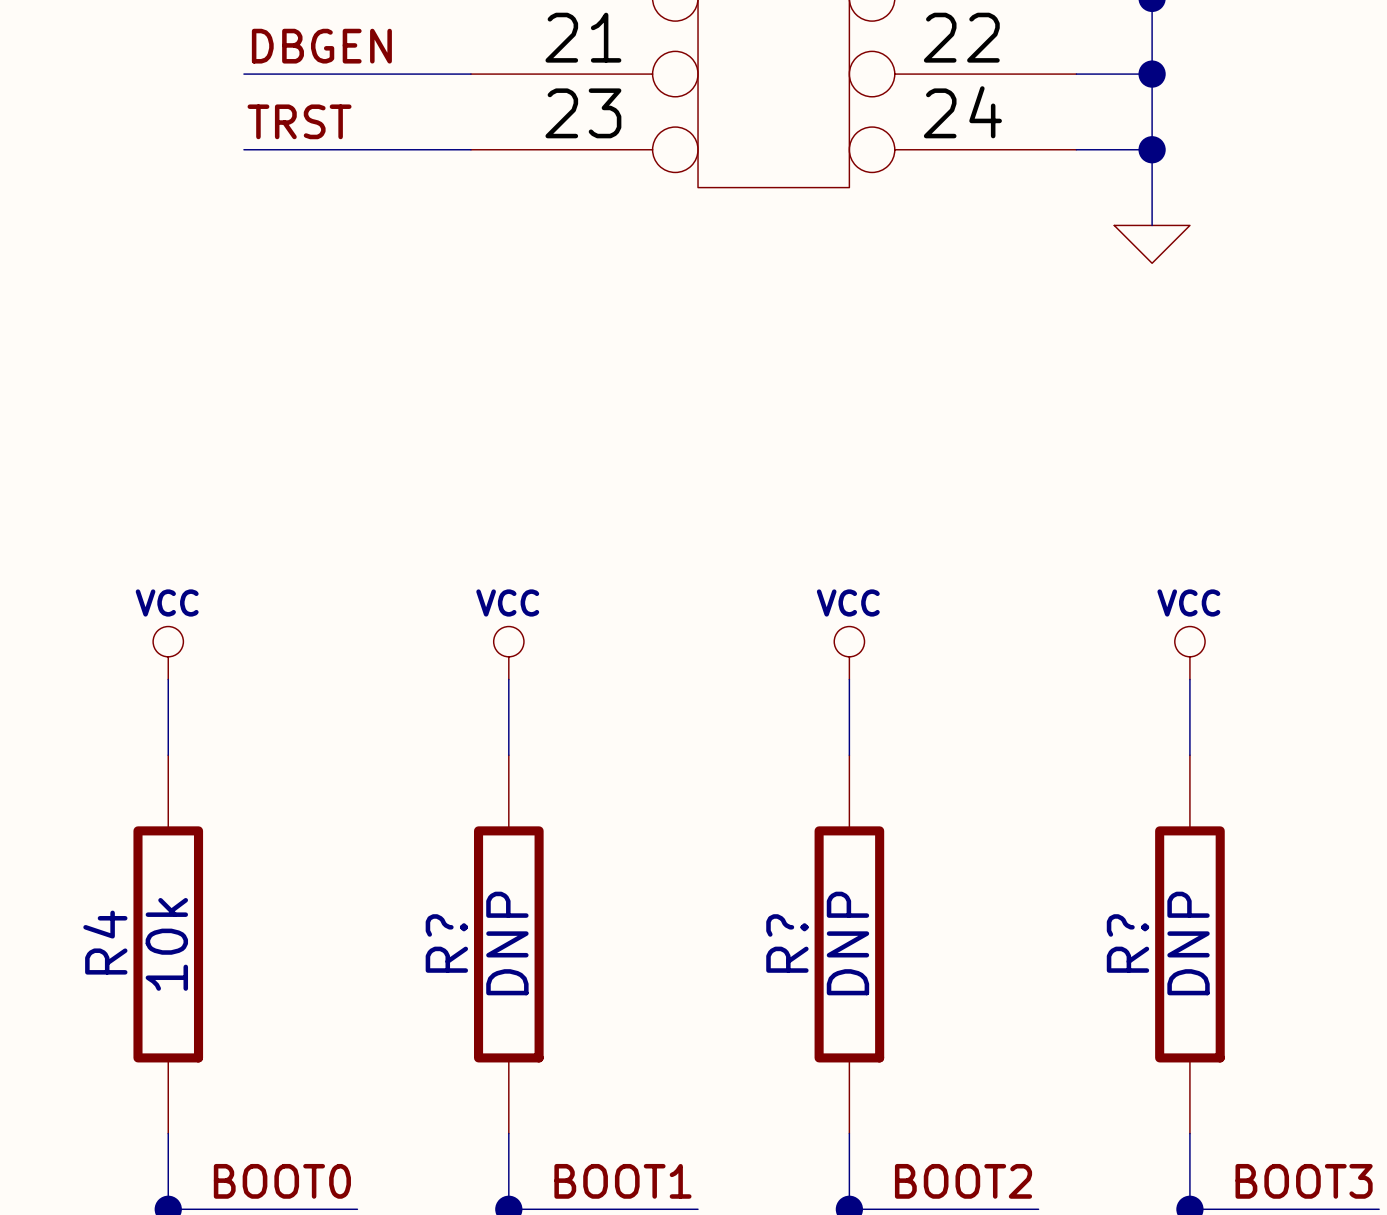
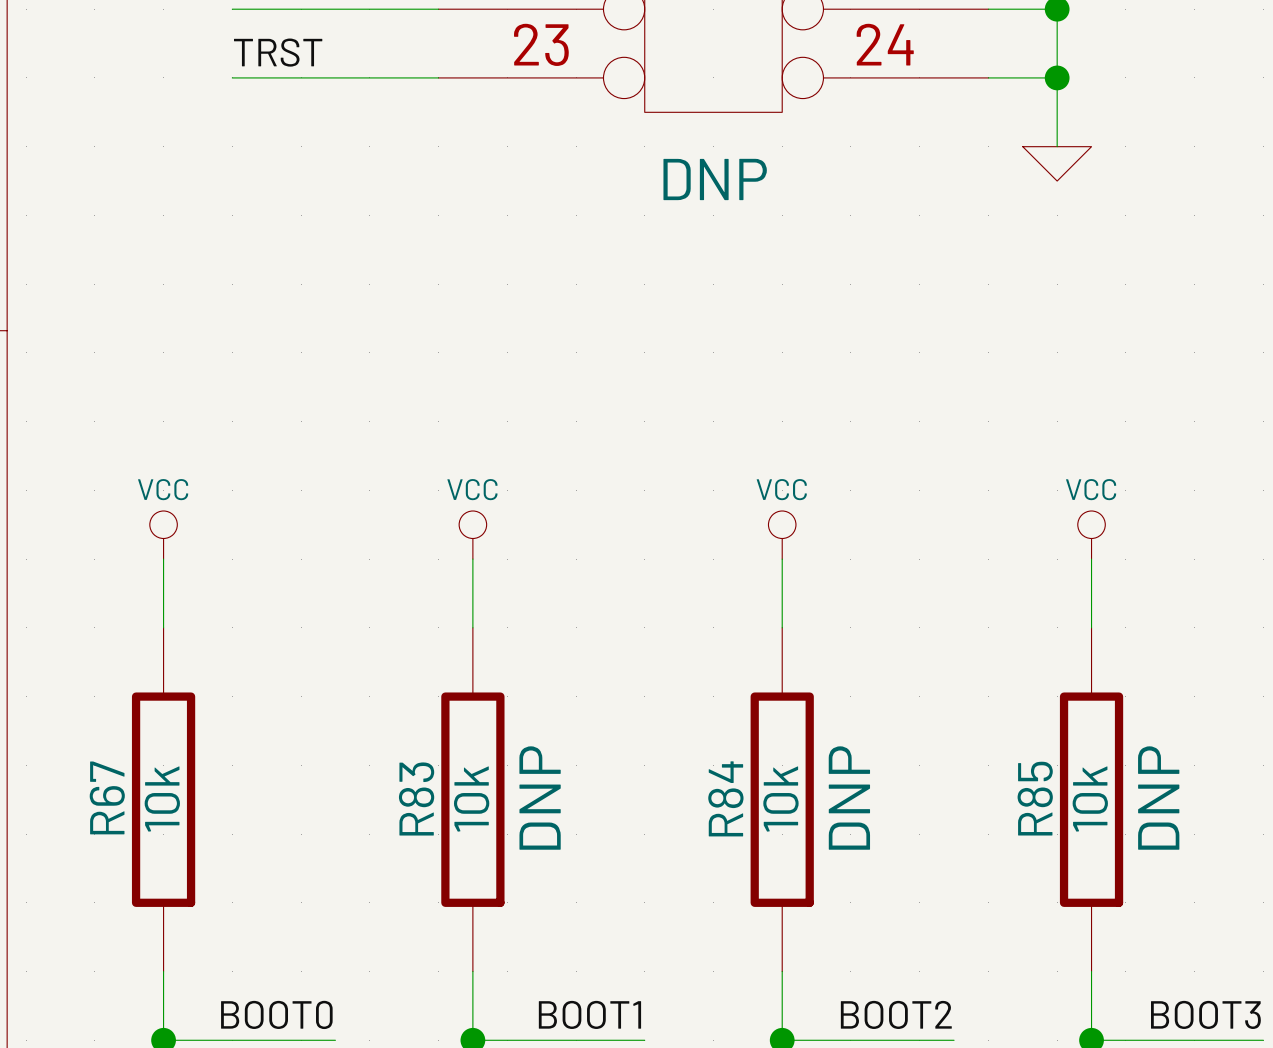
part text: none -> DNP (715, 179)
R4 name: R4 (105, 942) -> R67 (107, 797)
R? name: R? (446, 943) -> R83 (416, 798)
R? value: DNP (507, 943) -> 10k (471, 799)
R? text: none -> DNP (540, 798)
R? name: R? (787, 943) -> R84 (725, 798)
R? value: DNP (847, 943) -> 10k (780, 799)
R? text: none -> DNP (849, 798)
R? name: R? (1127, 943) -> R85 (1035, 798)
R? value: DNP (1188, 943) -> 10k (1090, 799)
R? text: none -> DNP (1158, 798)

